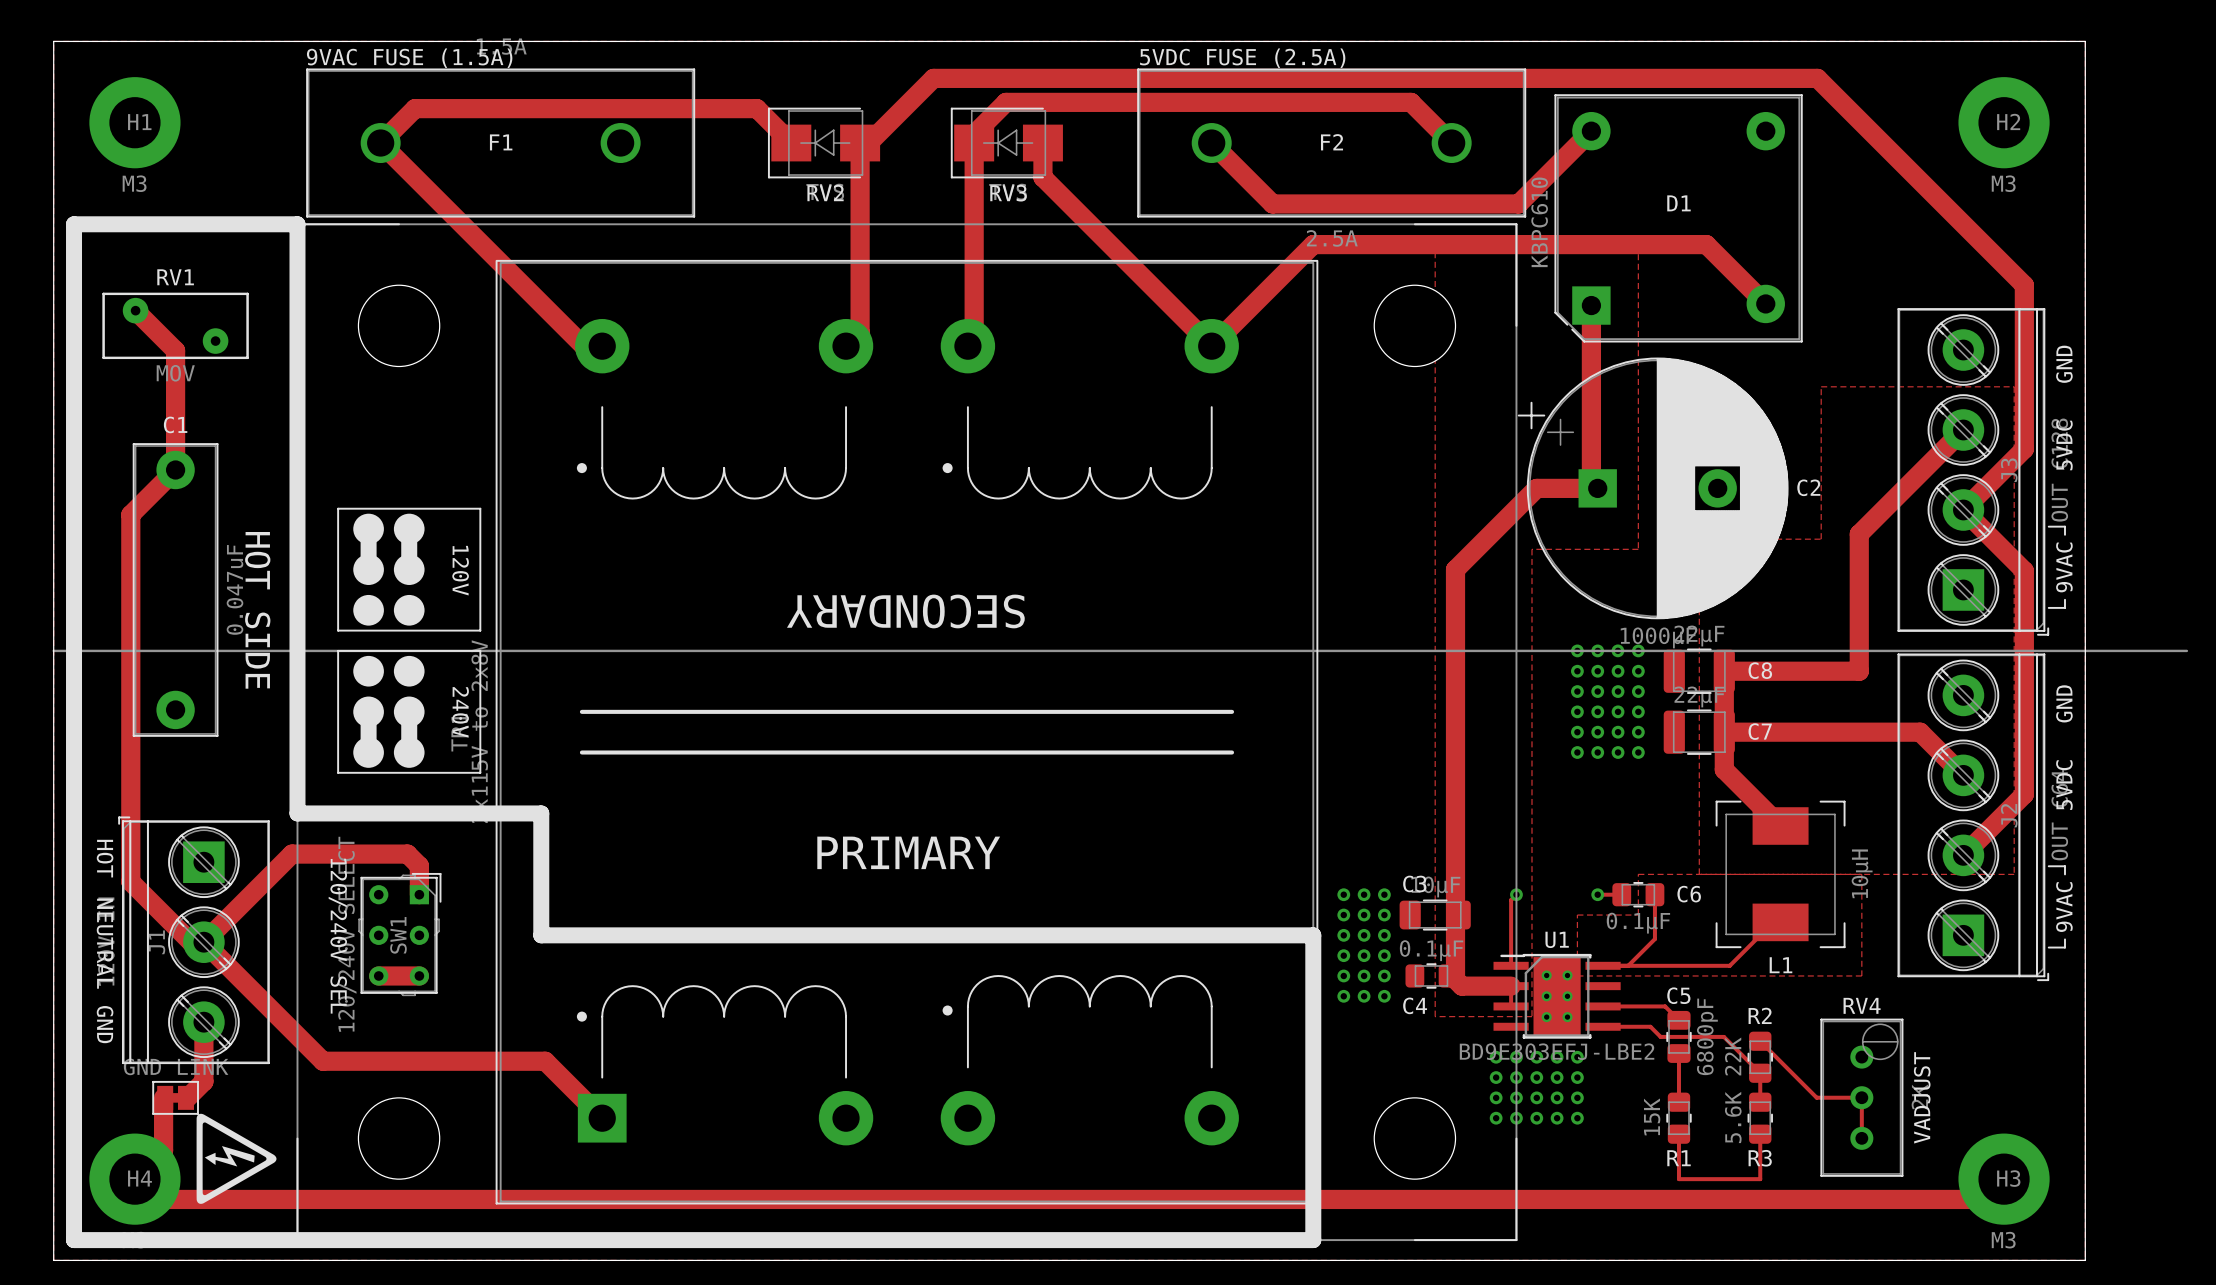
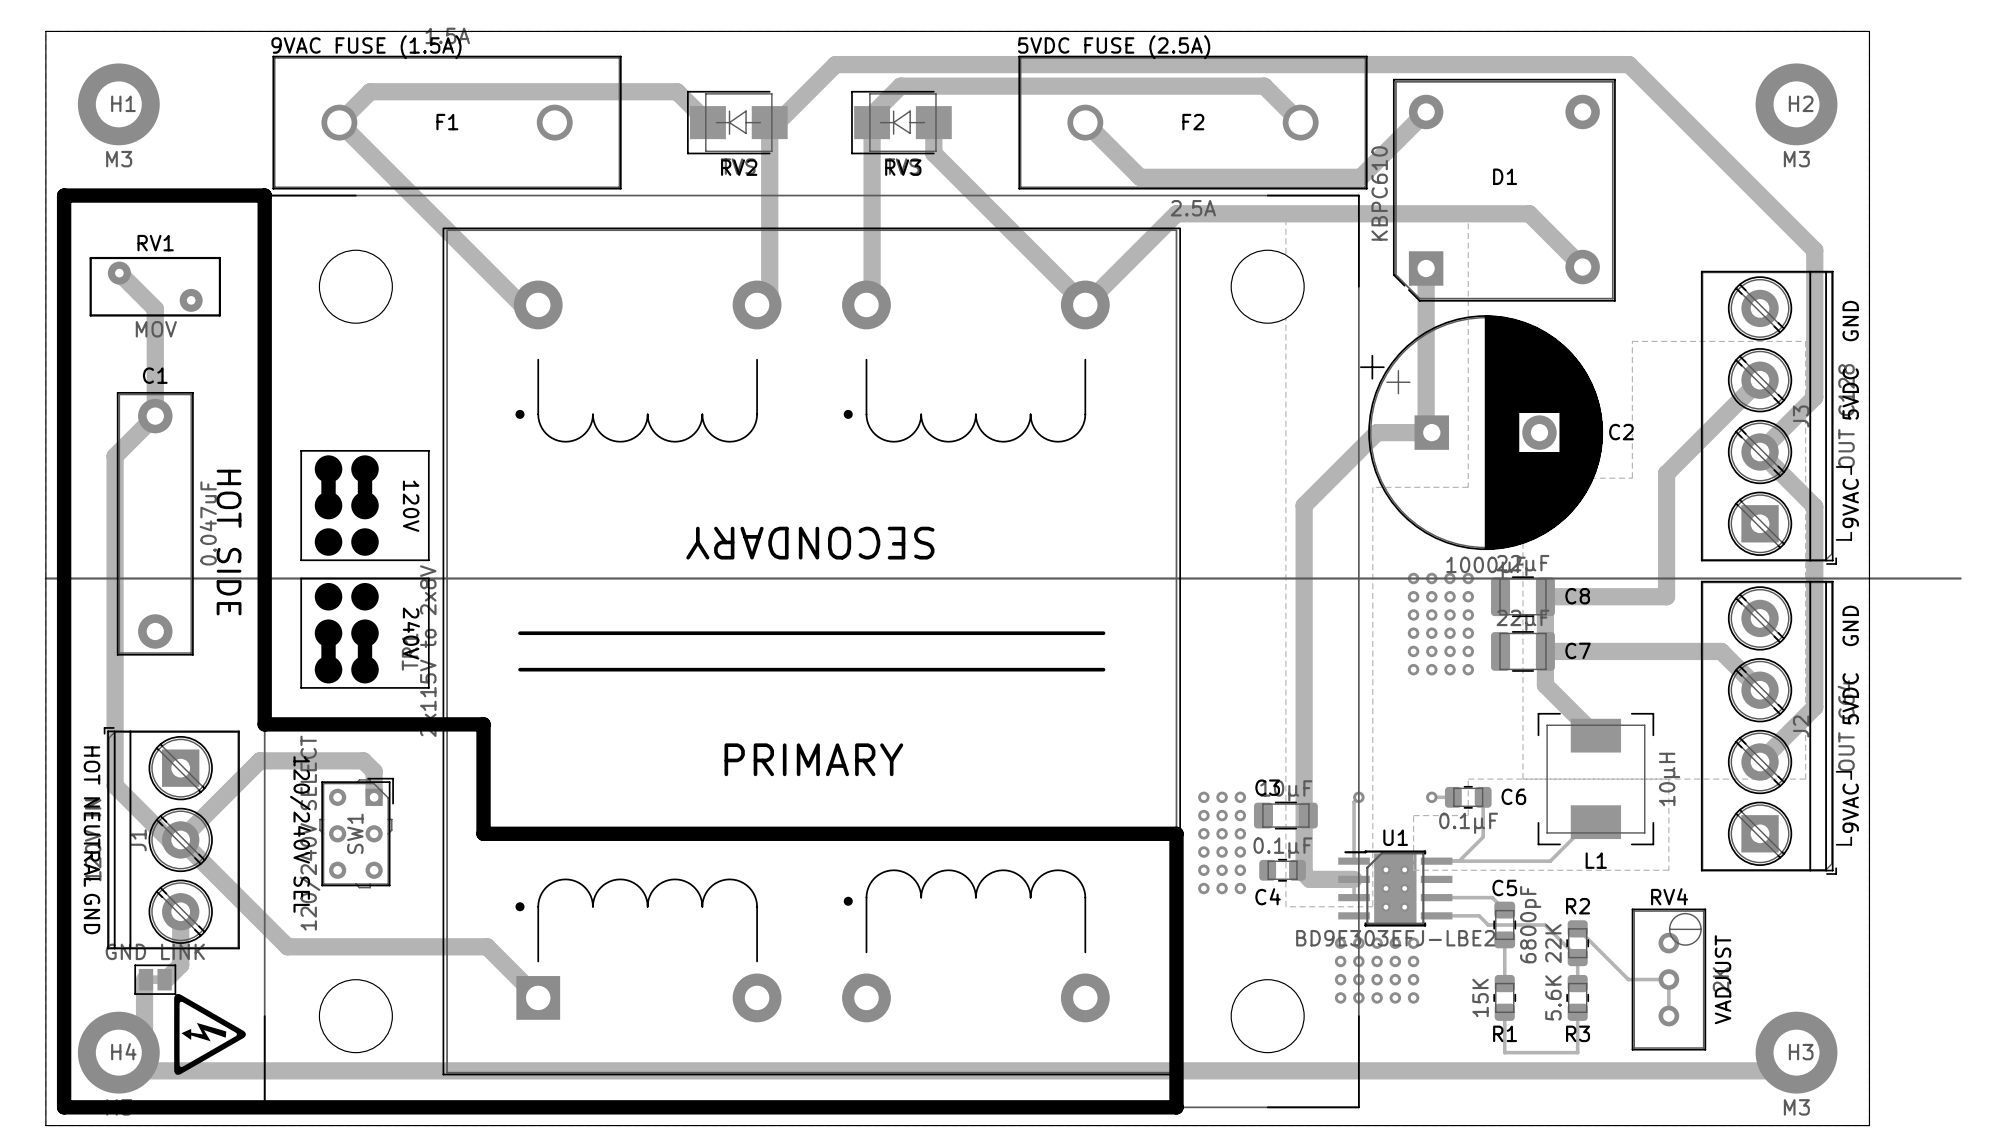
track: (378, 975) (419, 975) -> none

